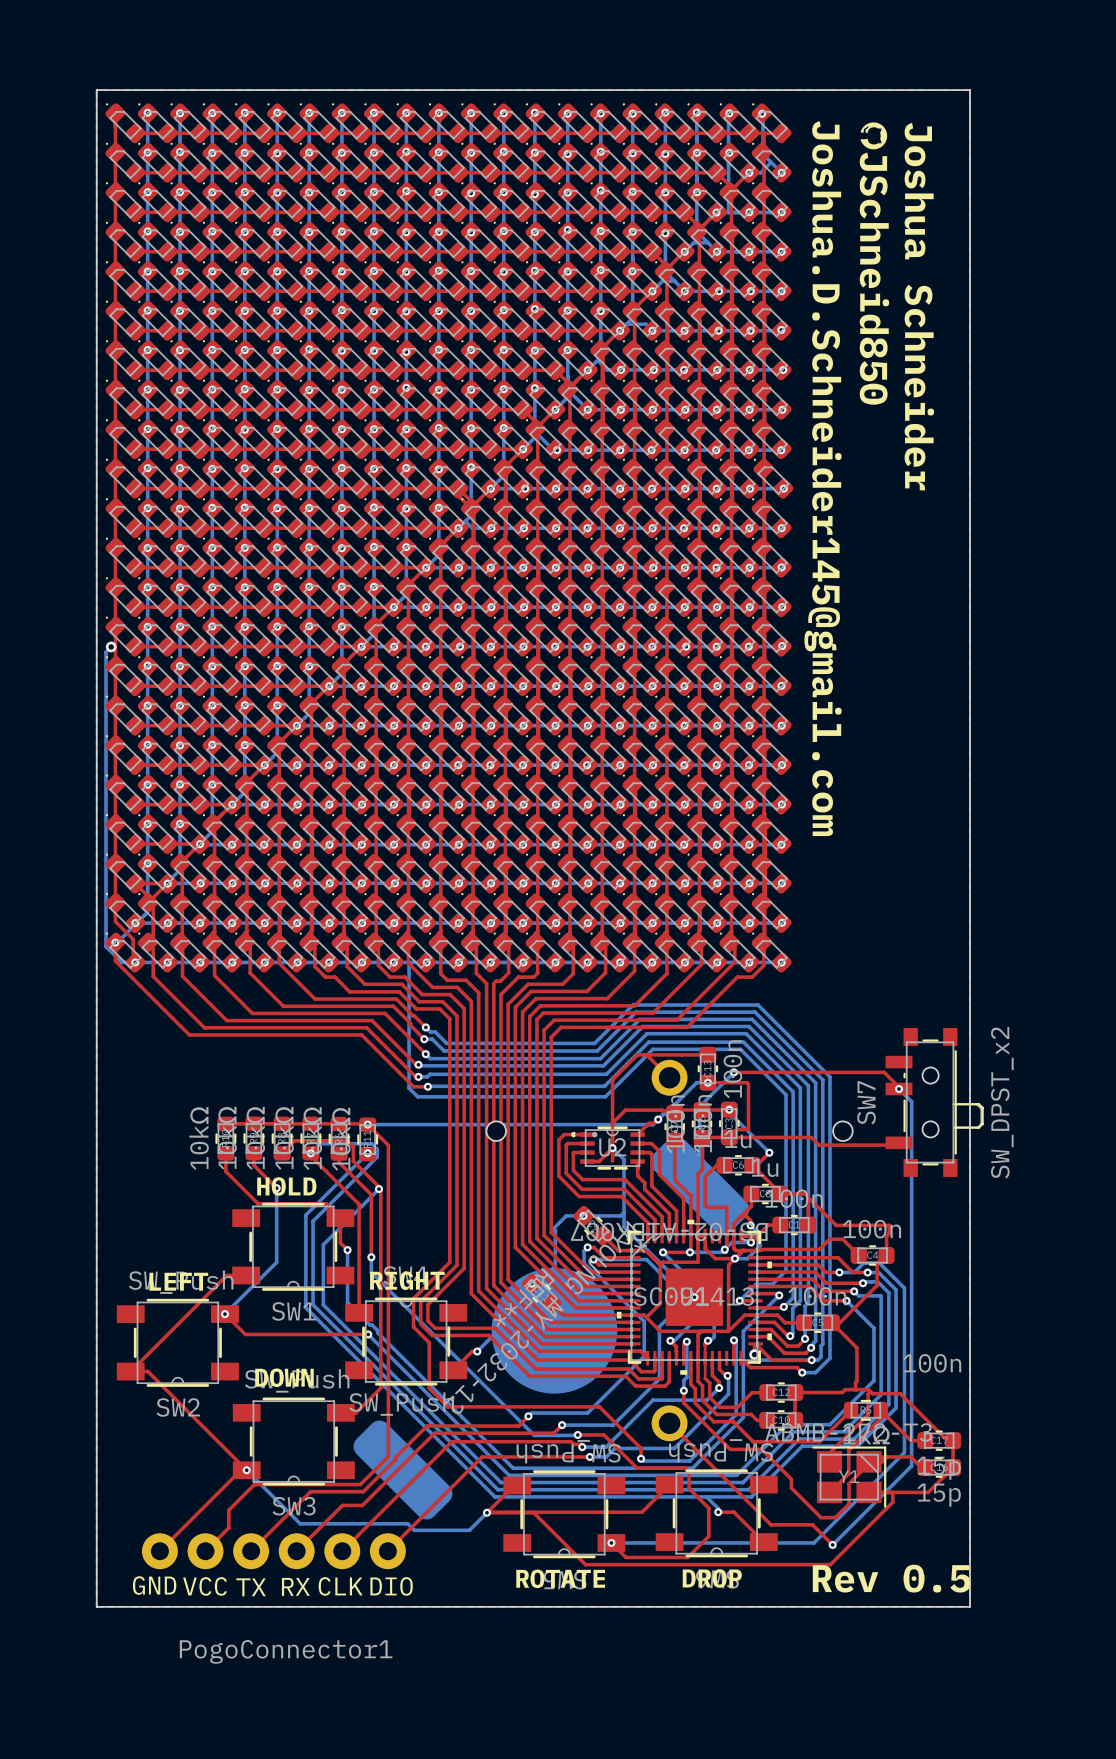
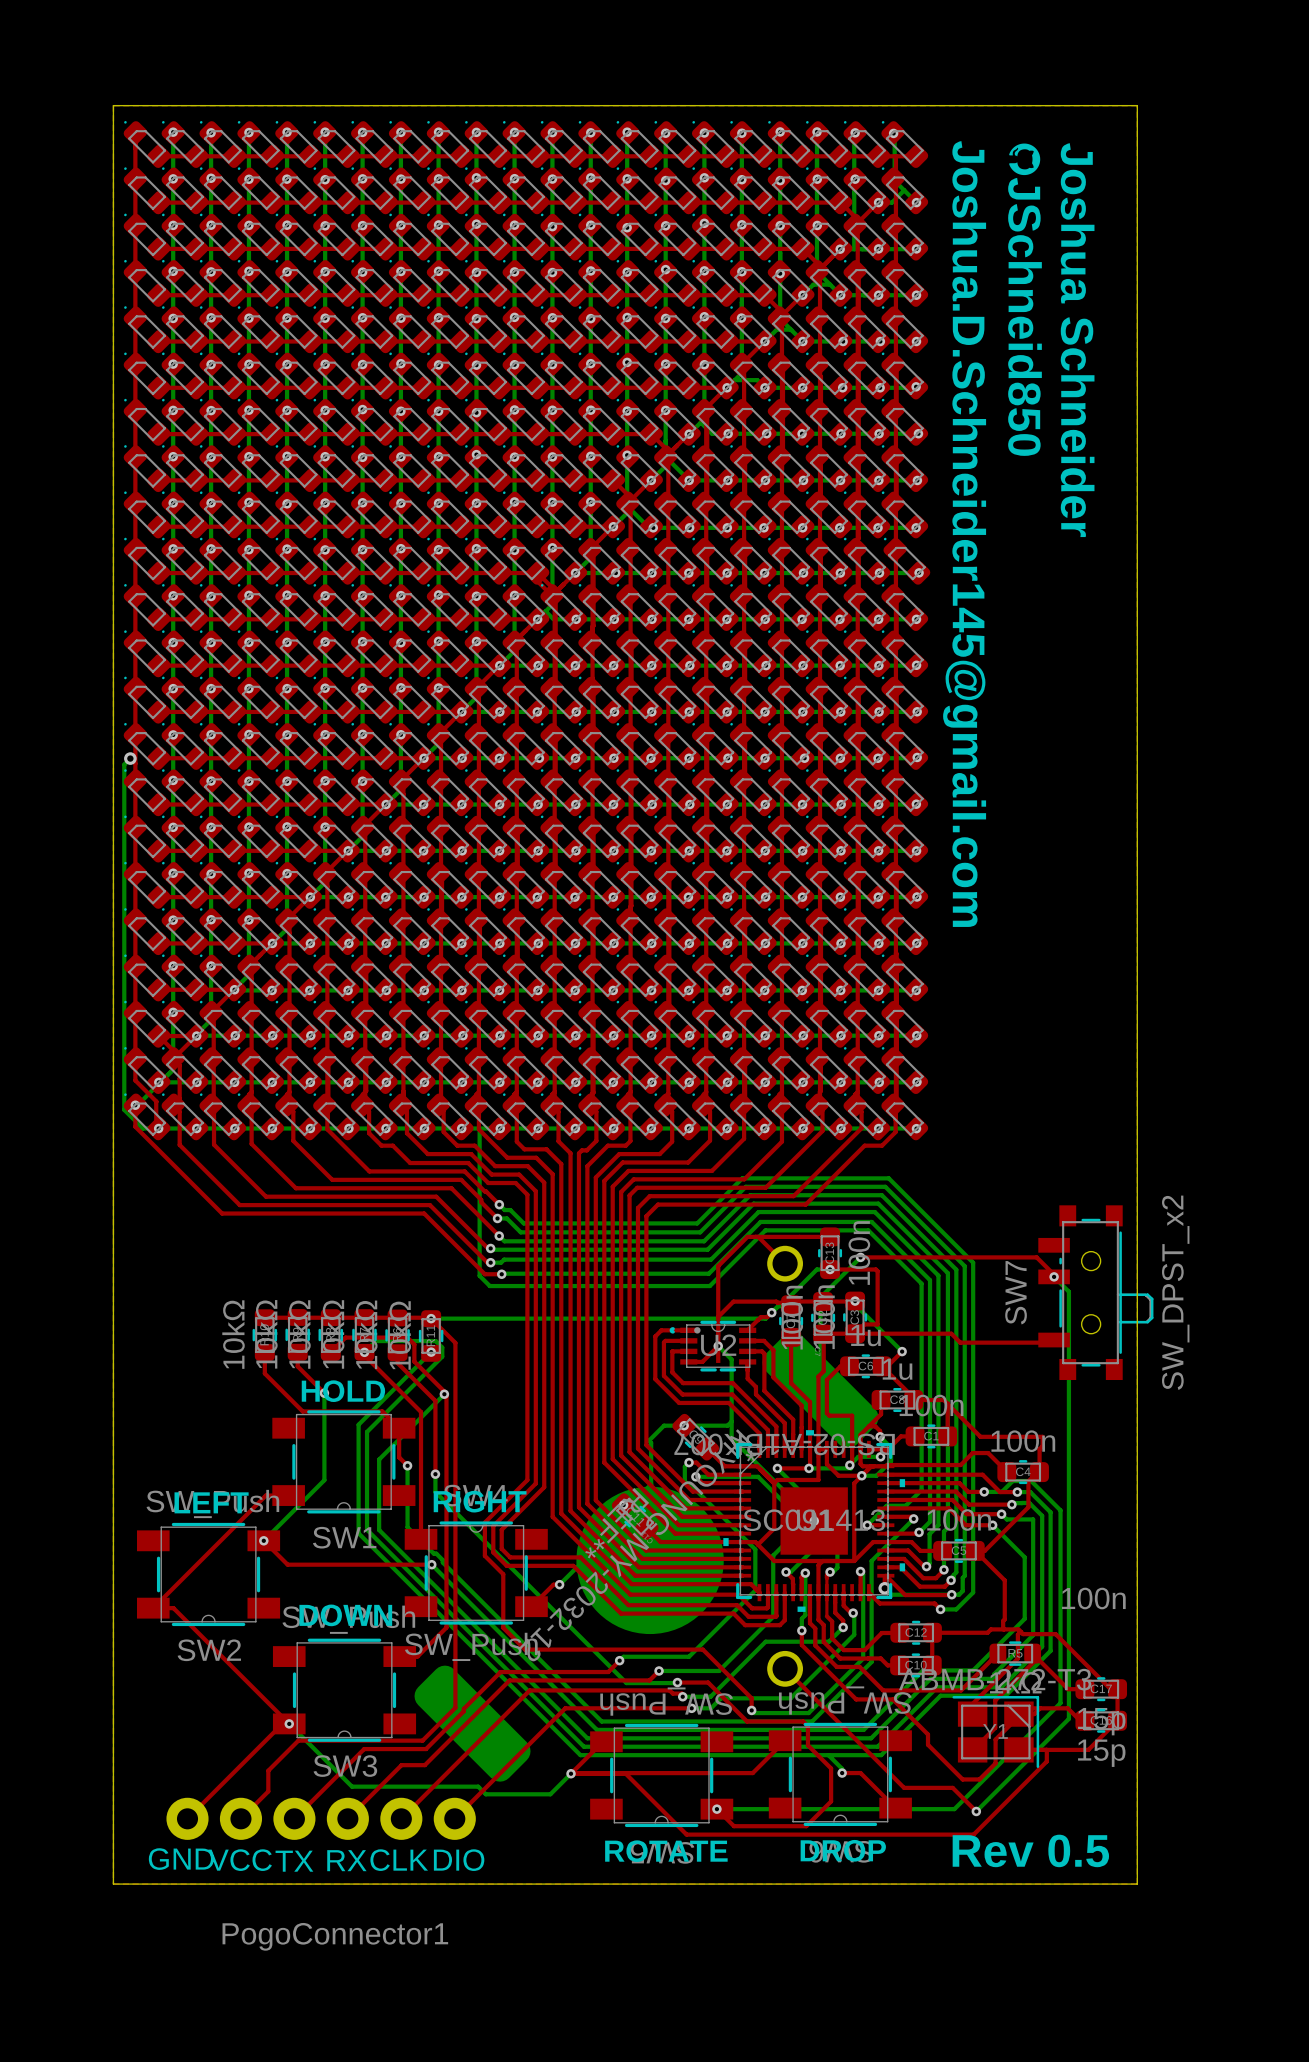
part footprint: [486, 1059, 853, 1442] -> [767, 1245, 804, 1687]

